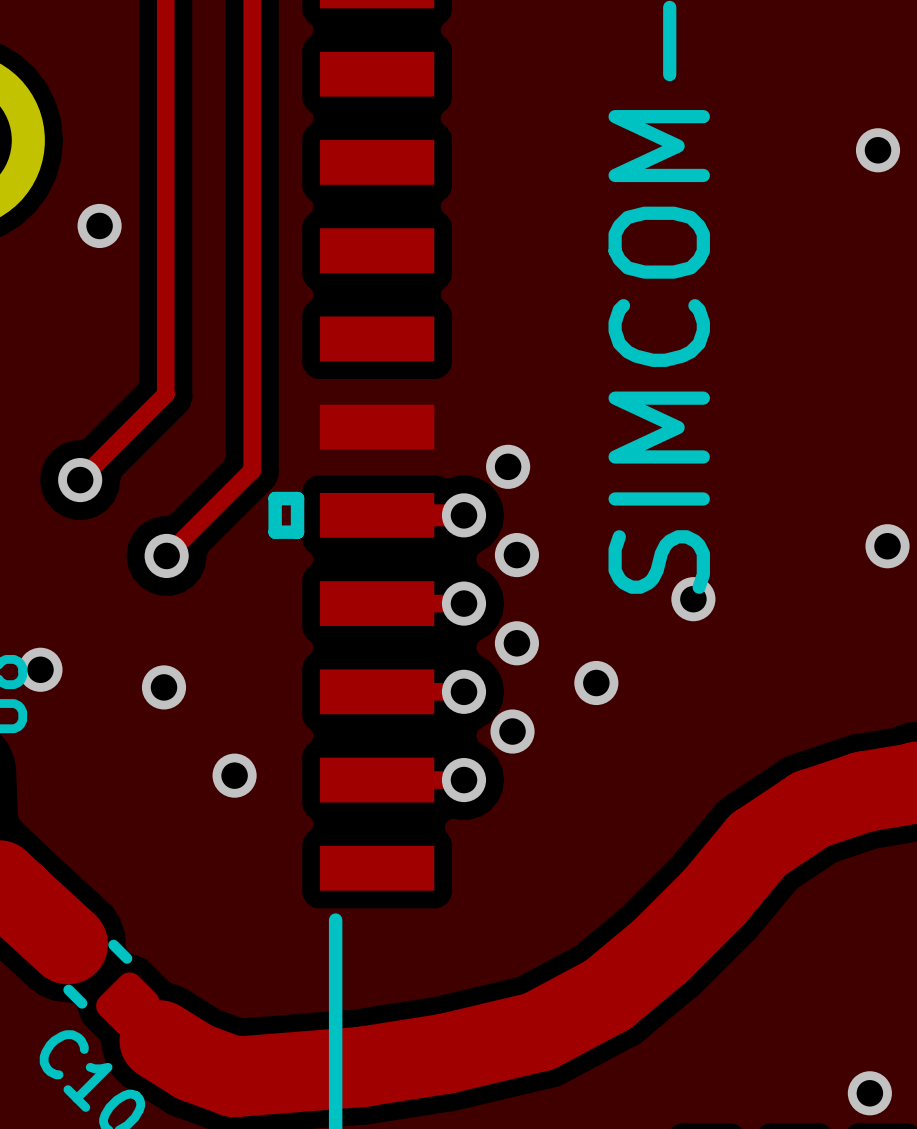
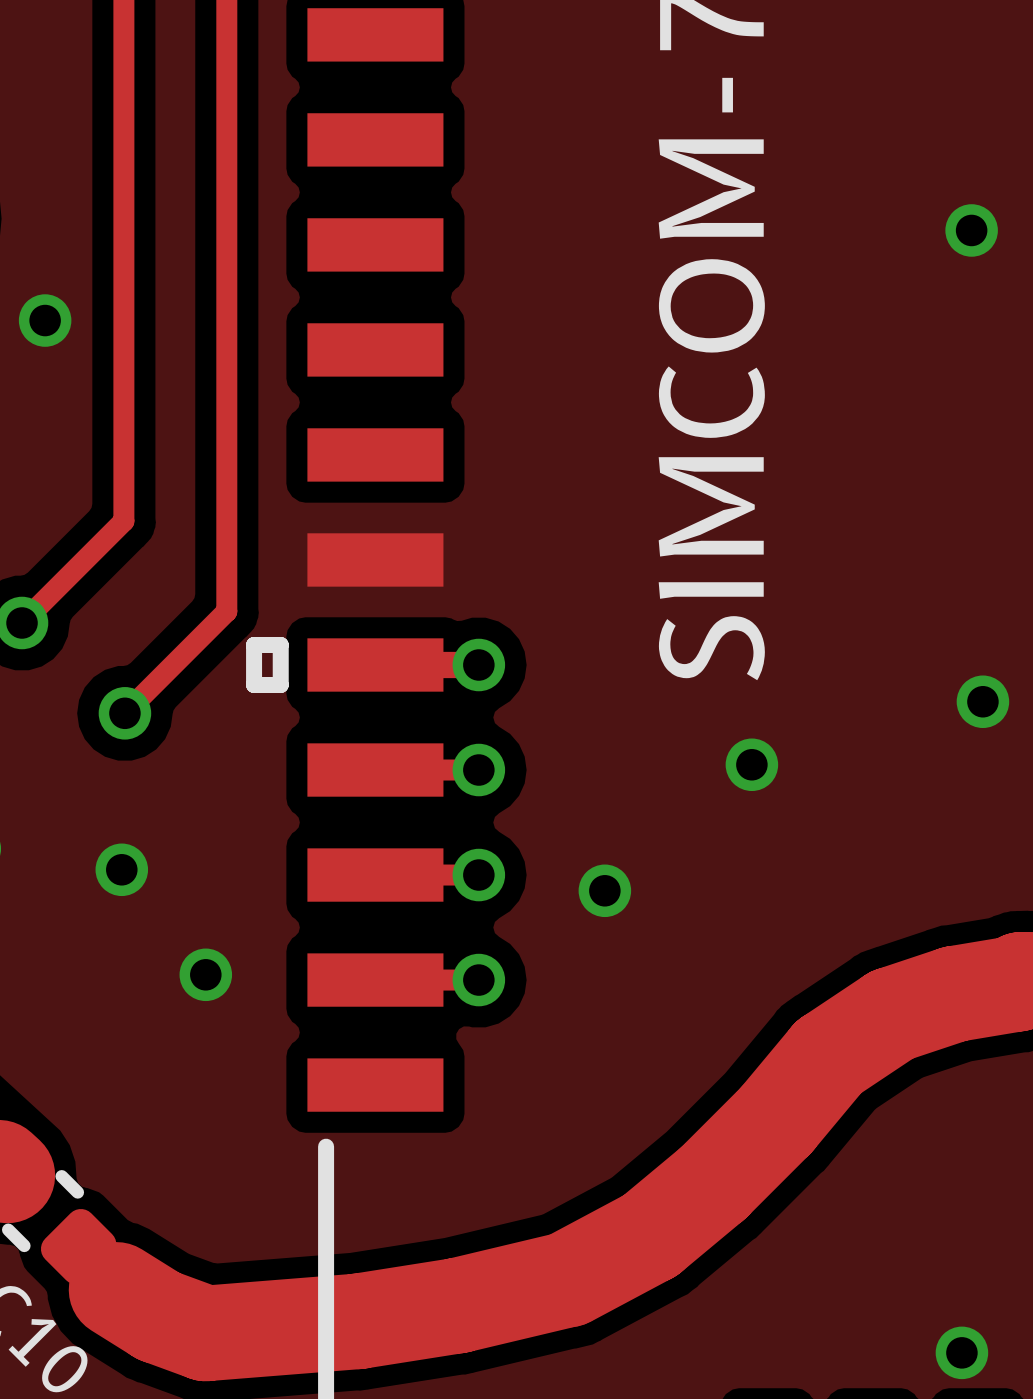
via: (508, 466) -> none
via: (516, 555) -> none
via: (516, 643) -> none
via position: (596, 683) -> (604, 890)
via: (512, 731) -> none

